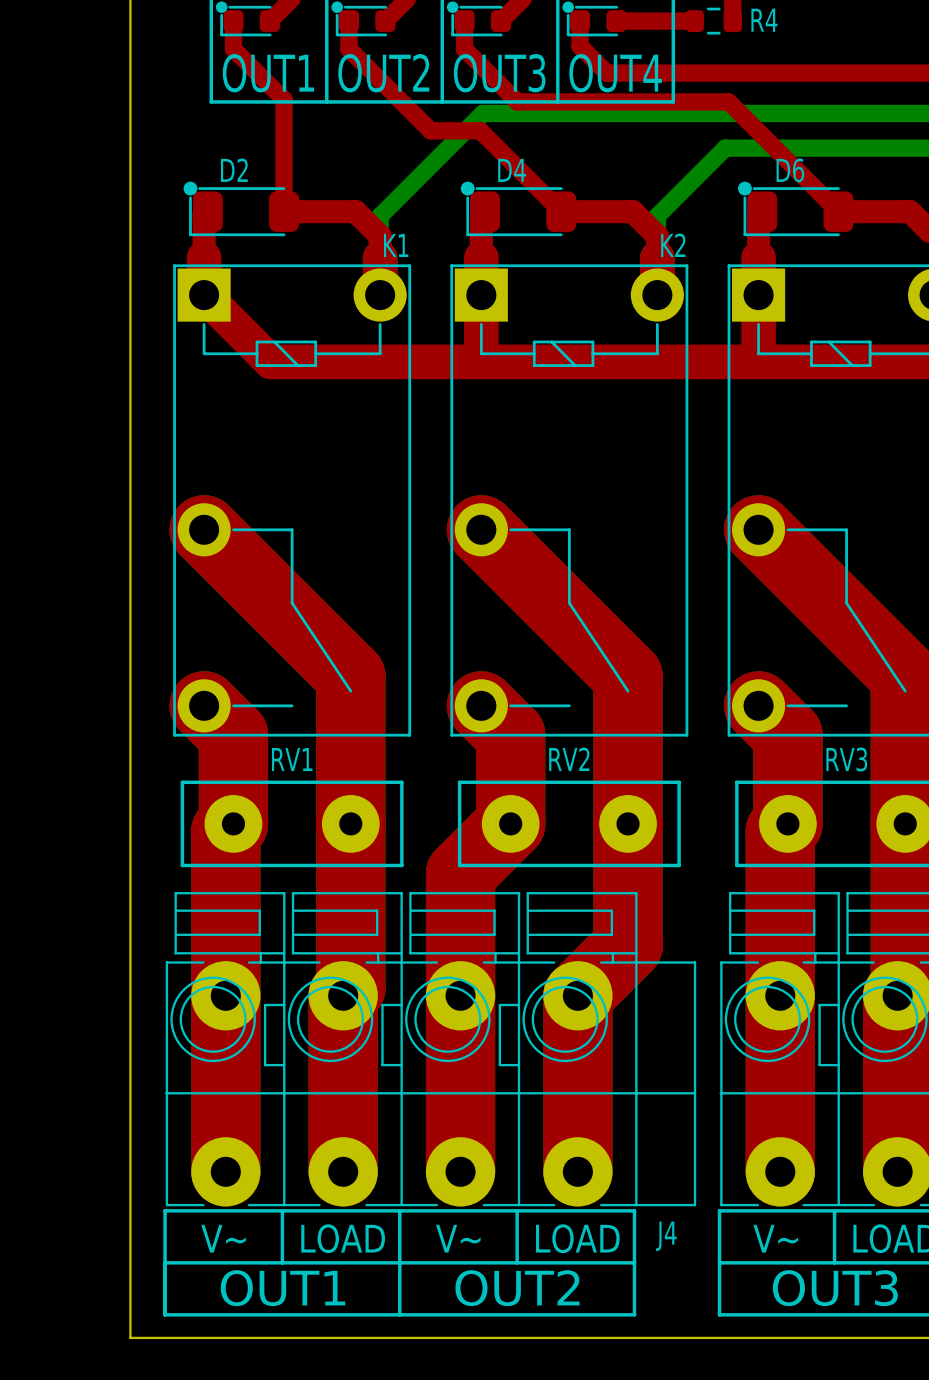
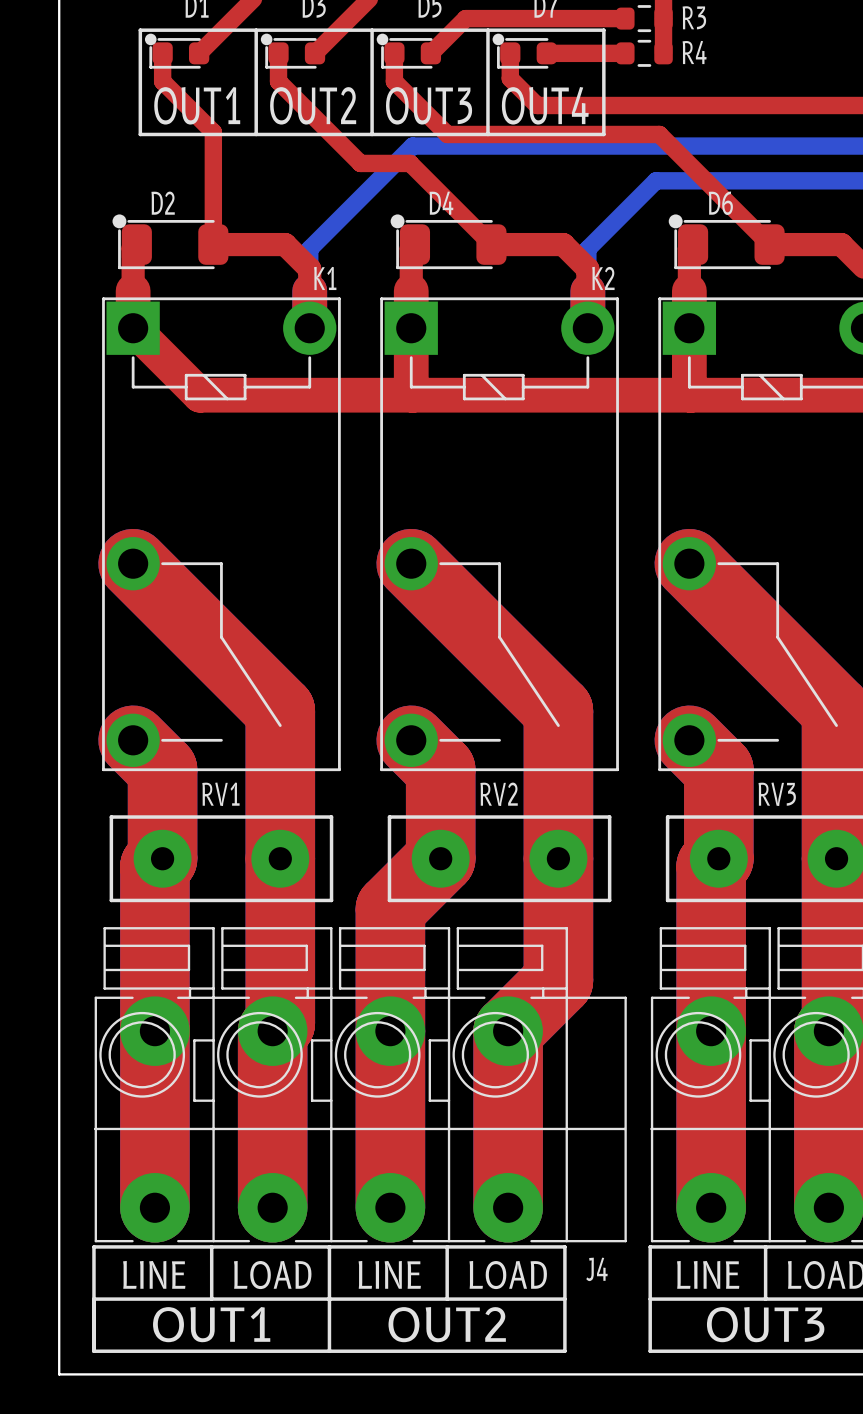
text: V~ (223, 1238) -> LINE (154, 1274)
text: V~ (458, 1238) -> LINE (389, 1274)
text: V~ (775, 1238) -> LINE (708, 1274)

